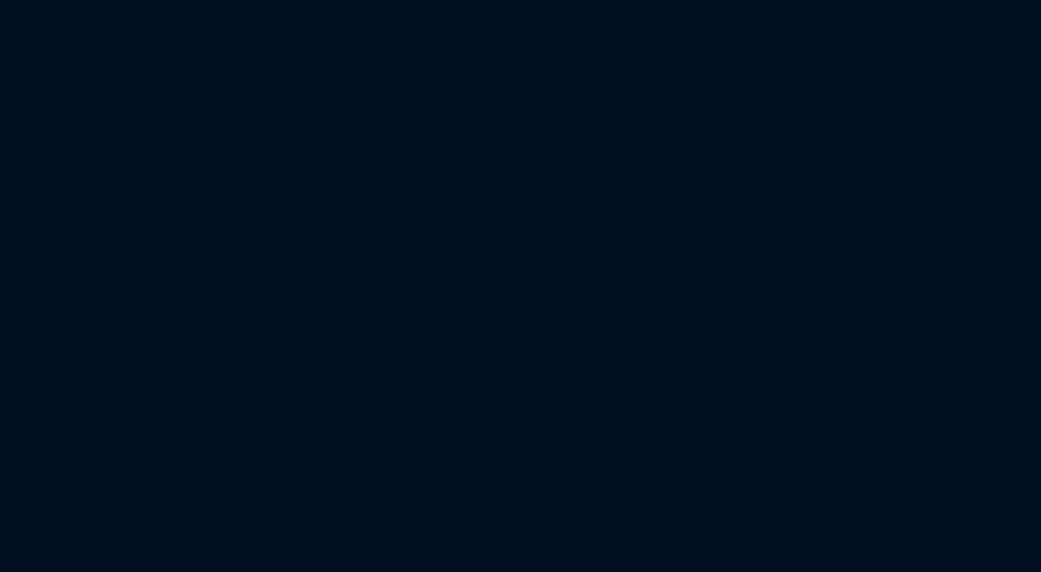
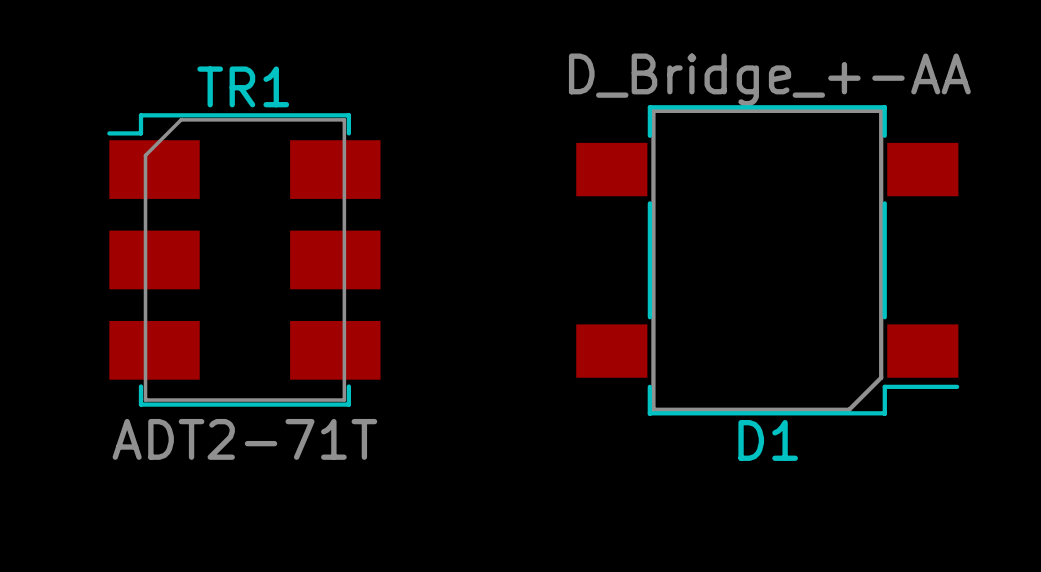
TR1: none -> ADT2-71T (243, 259)
D1: none -> D_Bridge_+-AA (767, 260)

